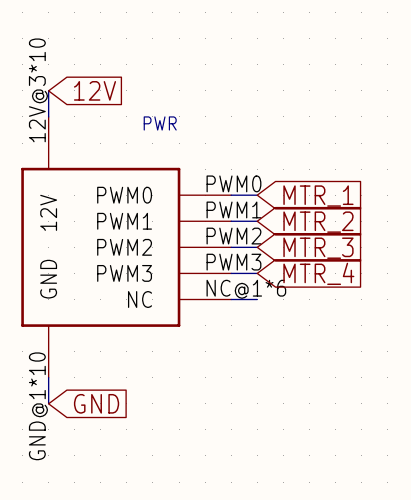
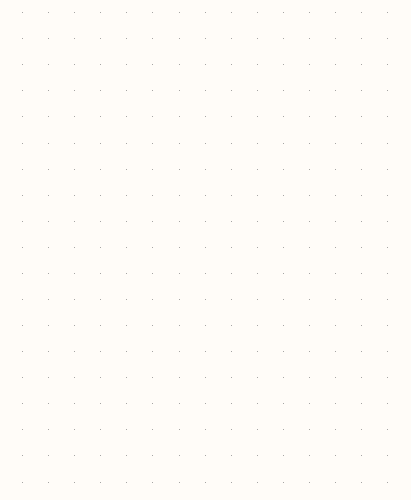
wire: (48, 90) (48, 116) -> none
global label: 12V (94, 90) -> none
wire: (231, 195) (257, 195) -> none
global label: MTR_1 (318, 196) -> none
wire: (231, 221) (257, 221) -> none
global label: MTR_2 (318, 222) -> none
PWR: (126, 247) -> none
wire: (231, 247) (257, 247) -> none
global label: MTR_3 (318, 248) -> none
wire: (231, 273) (257, 273) -> none
global label: MTR_4 (318, 273) -> none
wire: (231, 299) (257, 299) -> none
wire: (48, 377) (48, 403) -> none
global label: GND (96, 403) -> none

